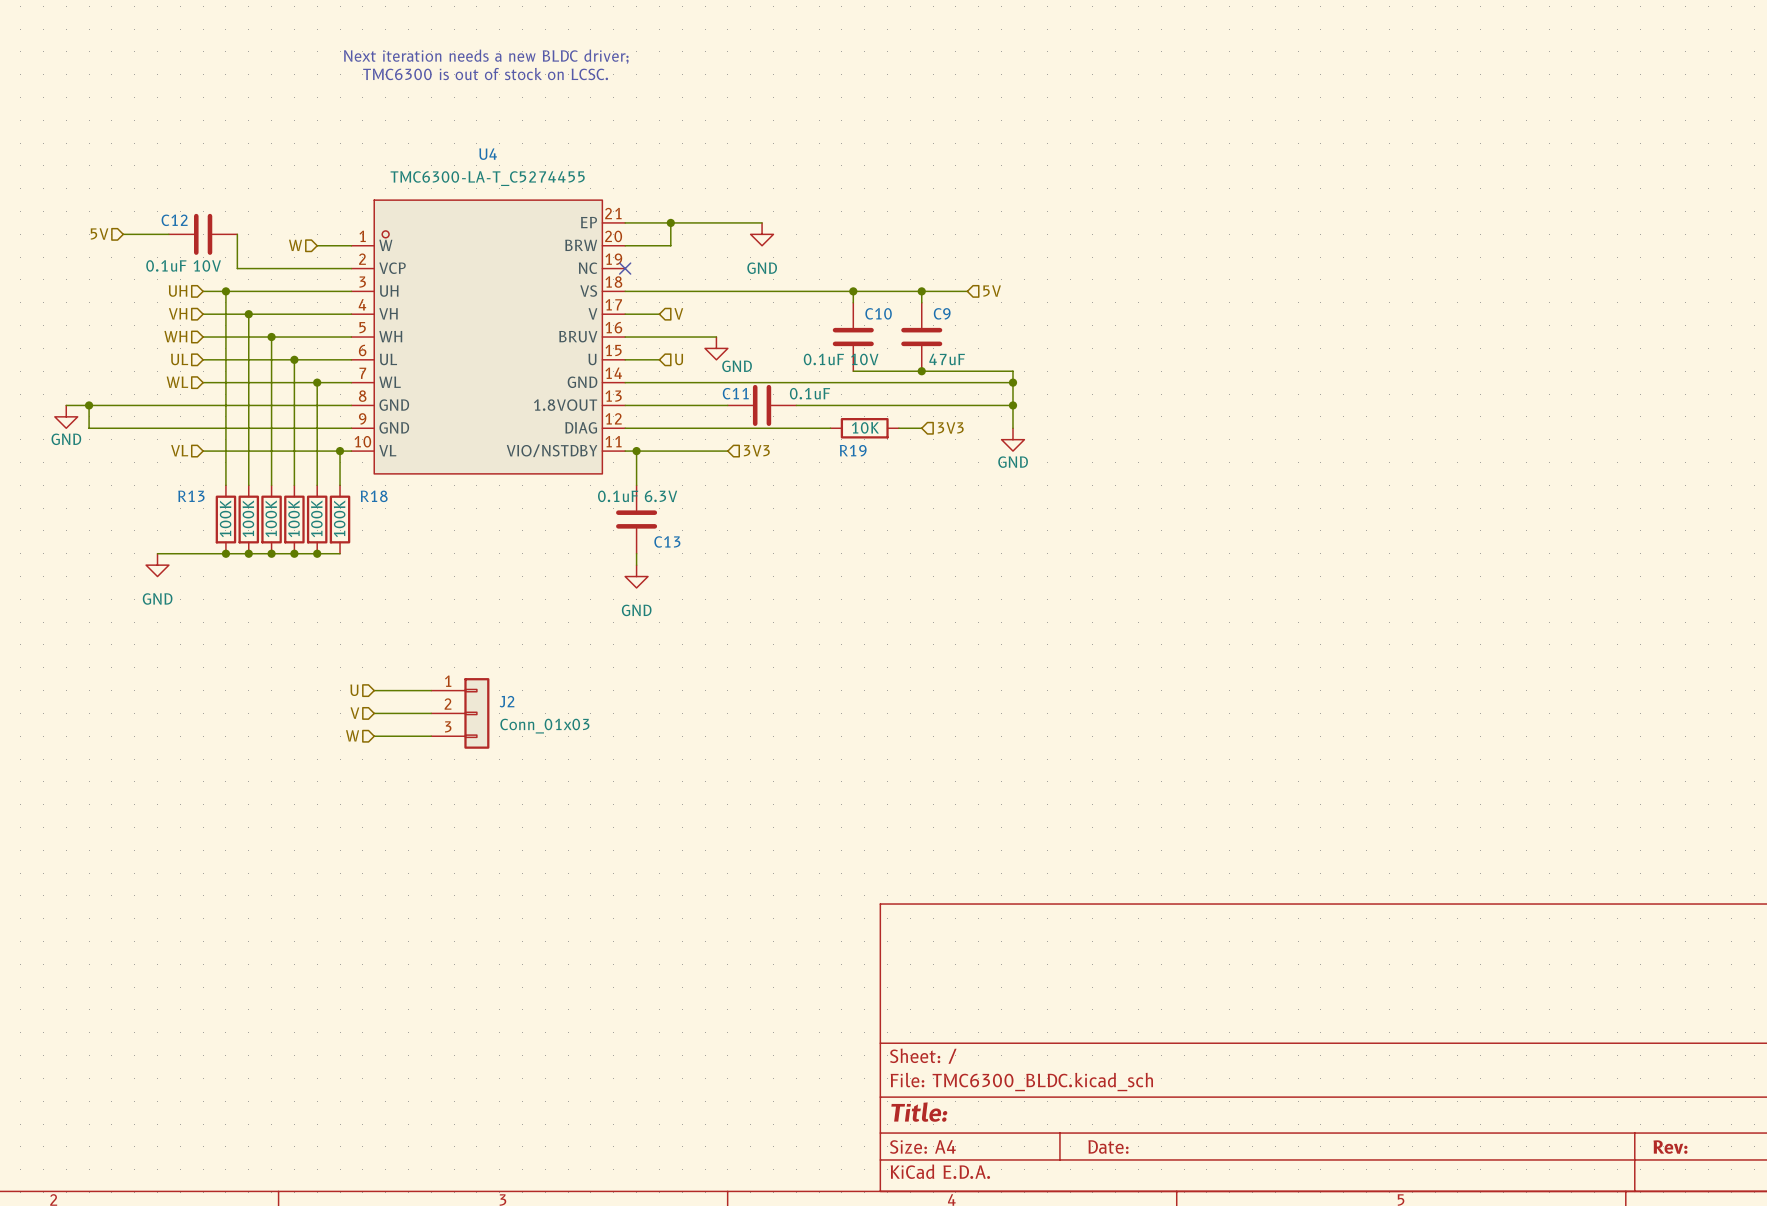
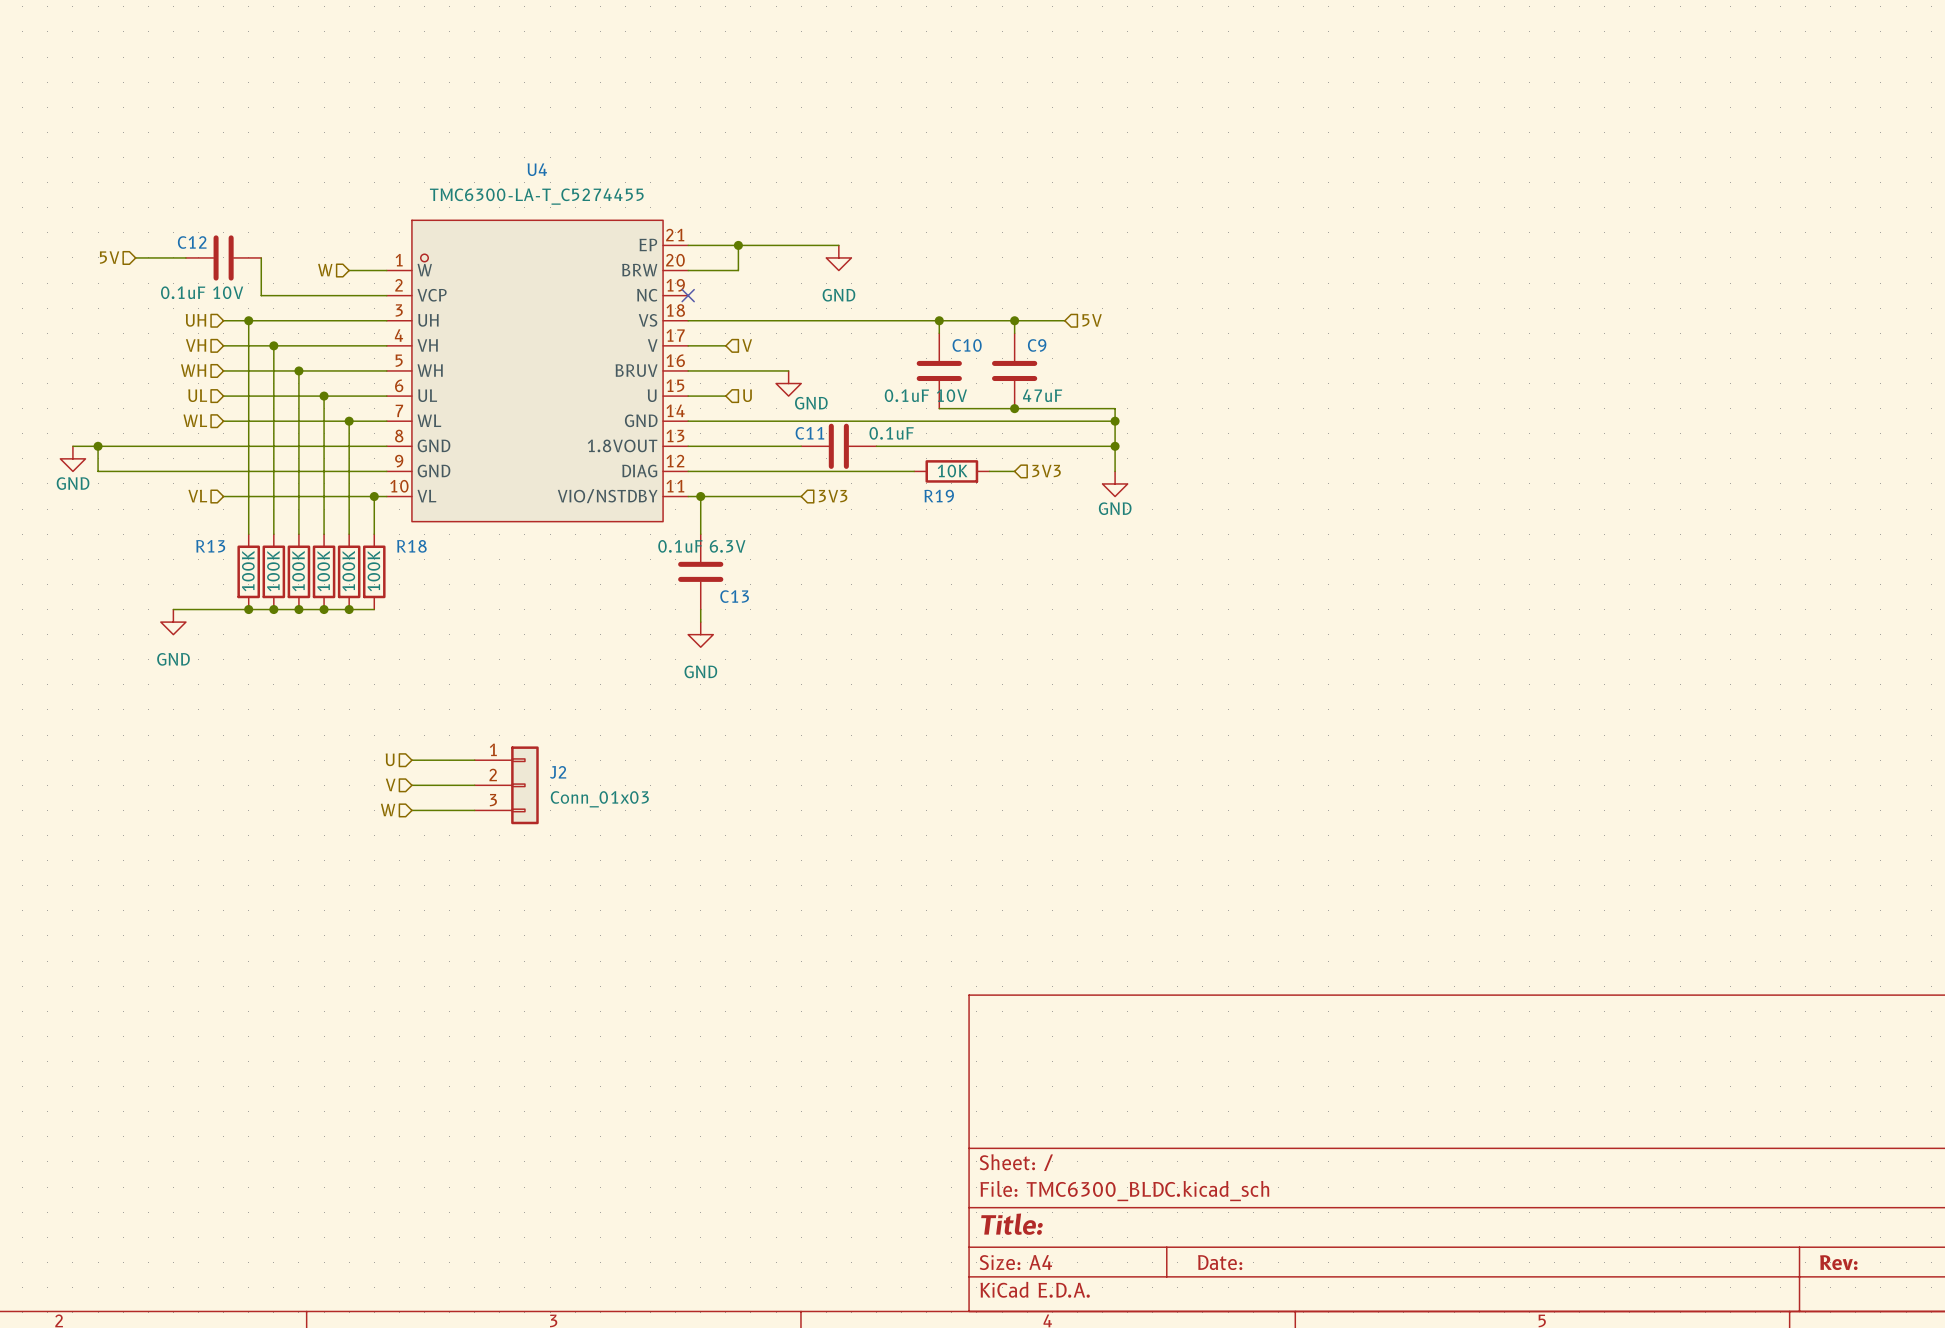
text: Next iteration needs a new BLDC driver; (486, 56) -> none
text: TMC6300 is out of stock on LCSC. (485, 74) -> none

